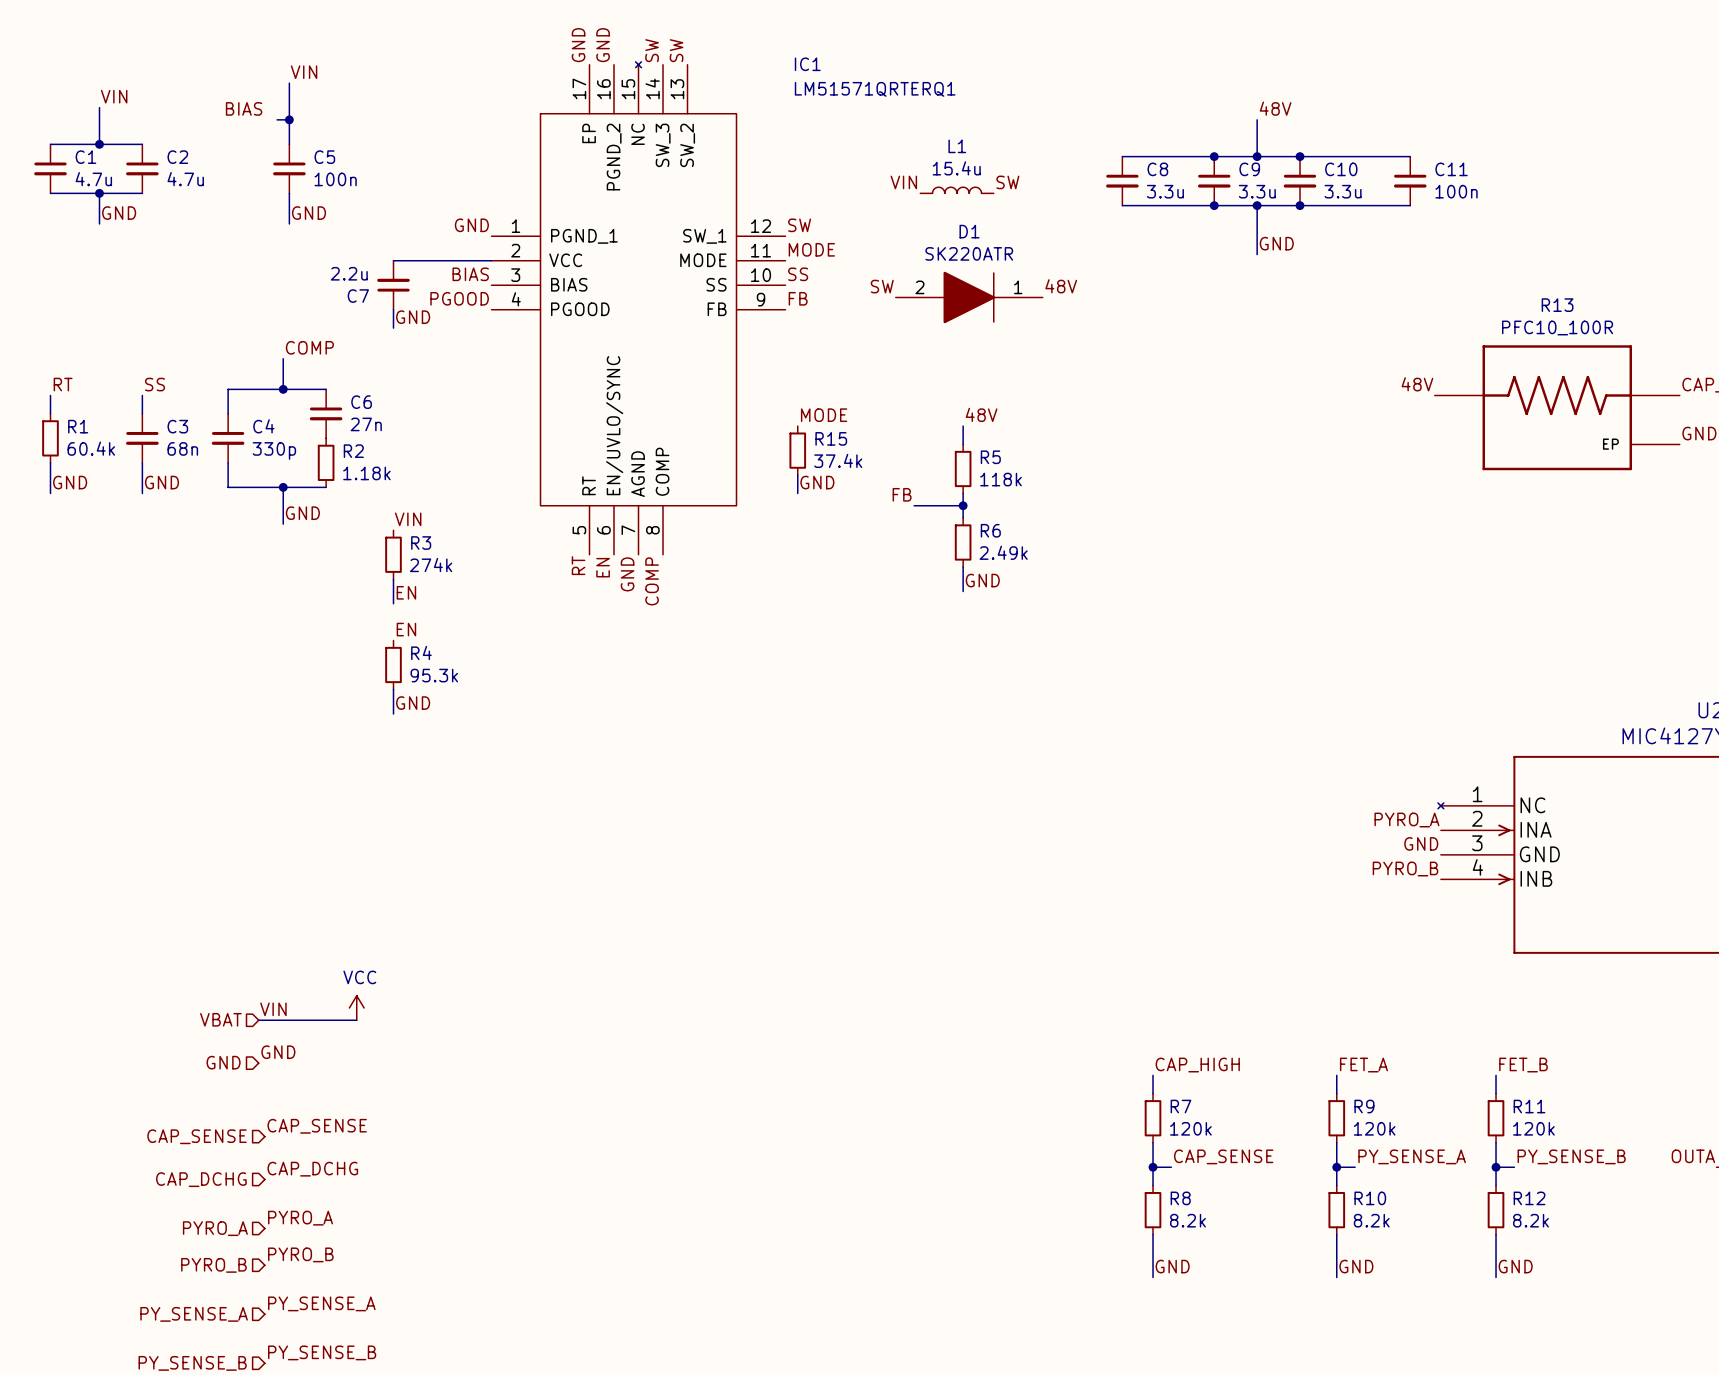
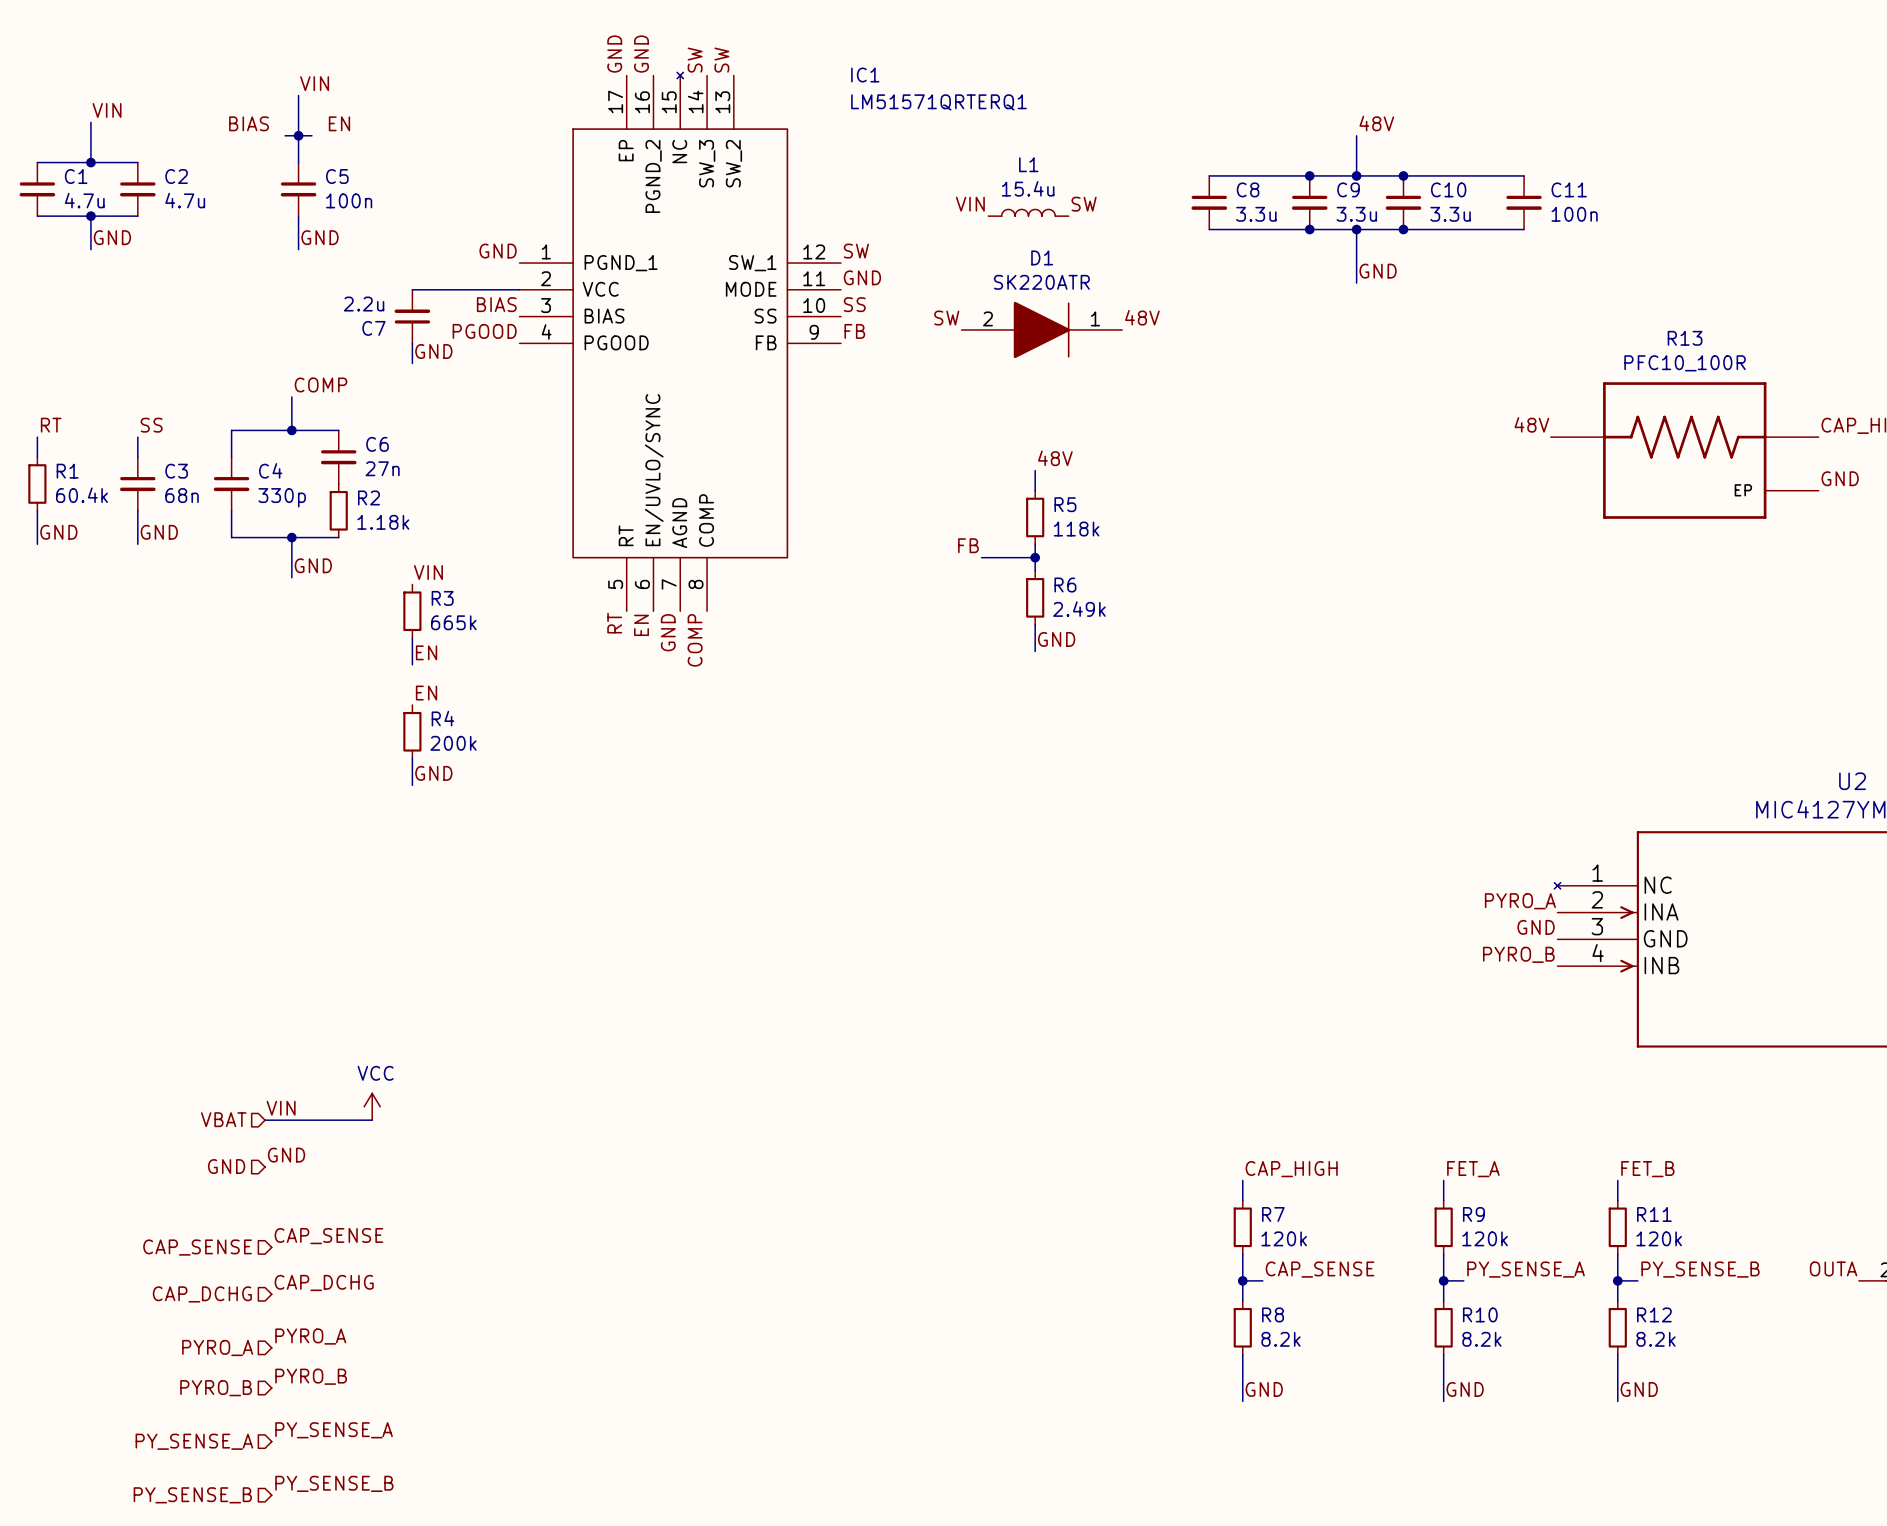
label: none -> EN (339, 123)
wire: none -> (298, 135) (311, 135)
label: MODE (811, 249) -> GND (862, 277)
label: MODE (824, 415) -> none
R15: 37.4k (797, 450) -> none
wire: (797, 475) (797, 493) -> none
label: GND (817, 482) -> none
R3 value: 274k (431, 565) -> 665k (453, 622)
R4 value: 95.3k (434, 675) -> 200k (453, 743)

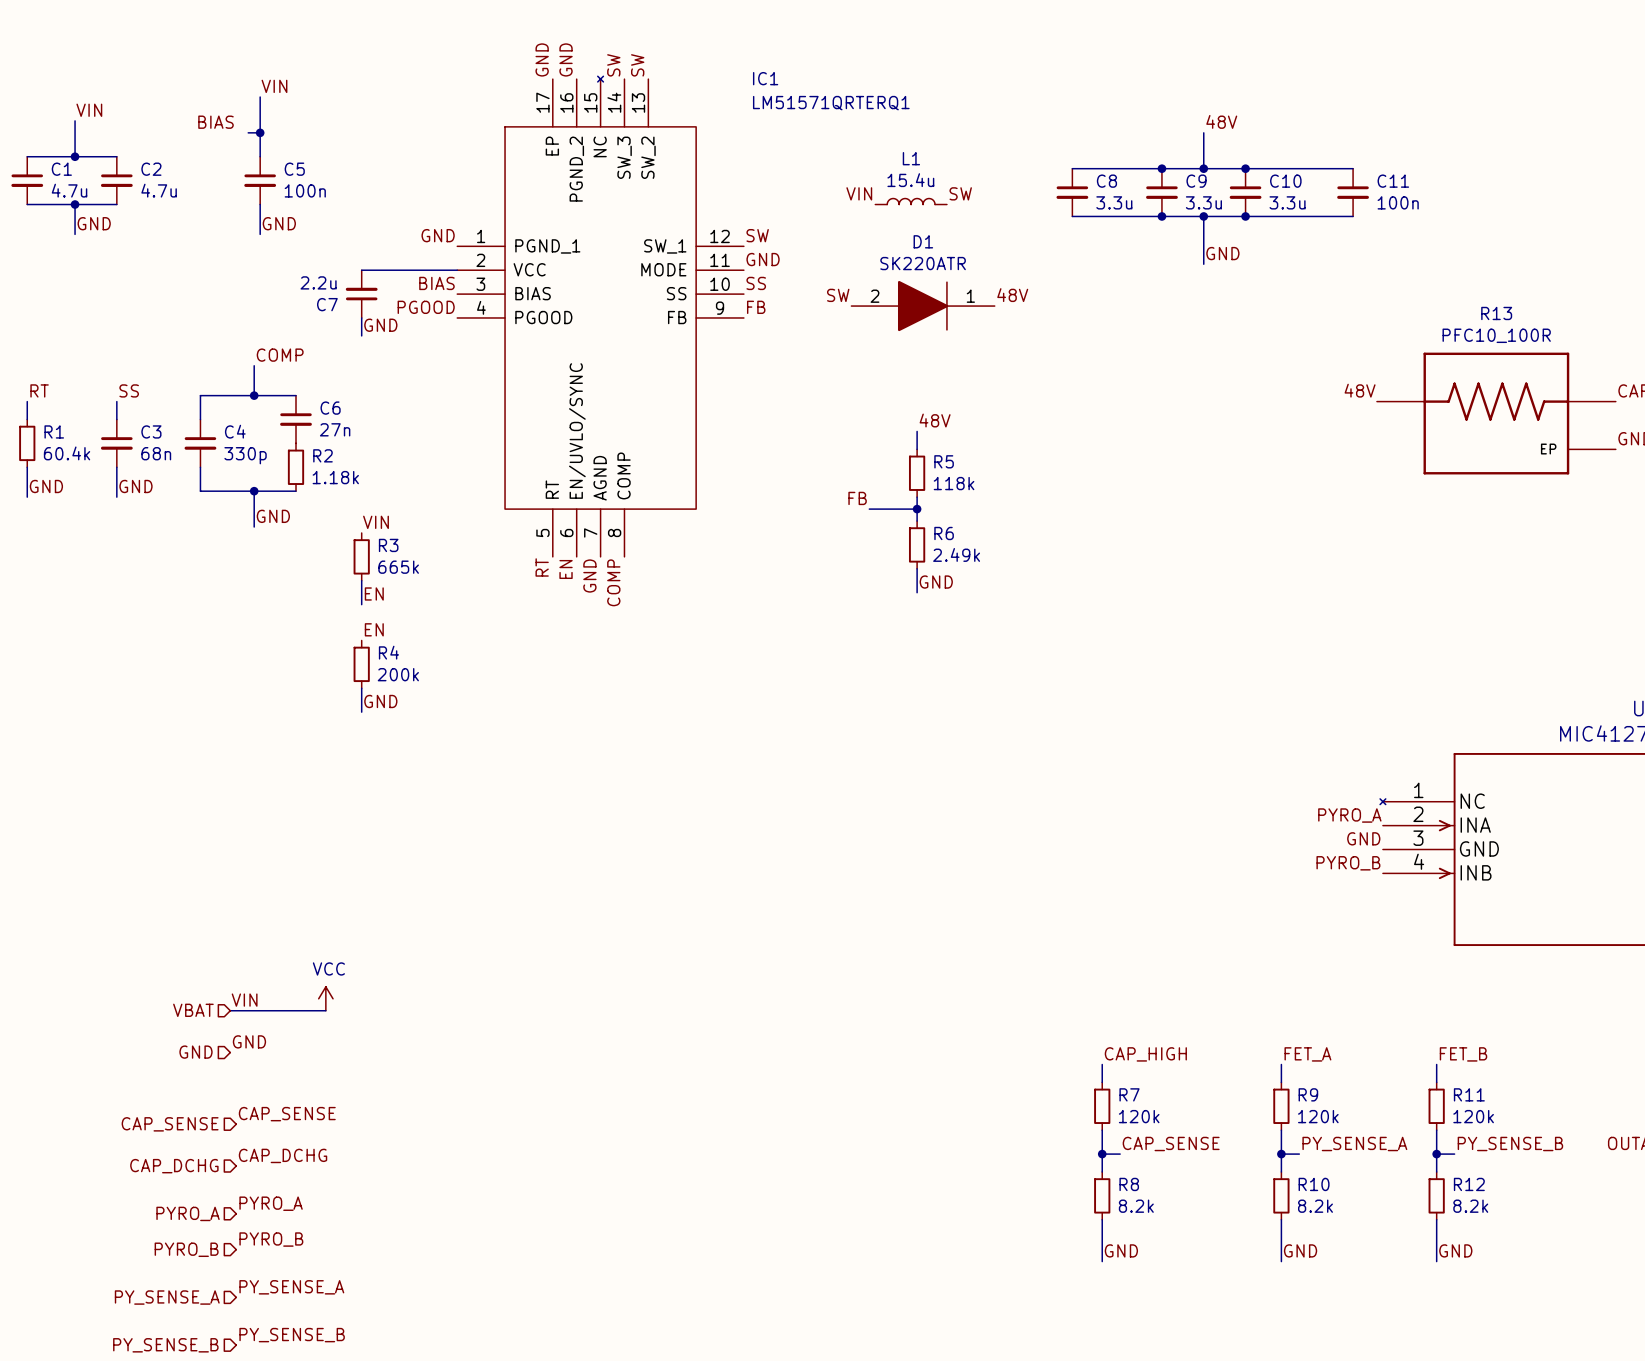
label: EN (339, 123) -> none
wire: (298, 135) (311, 135) -> none

